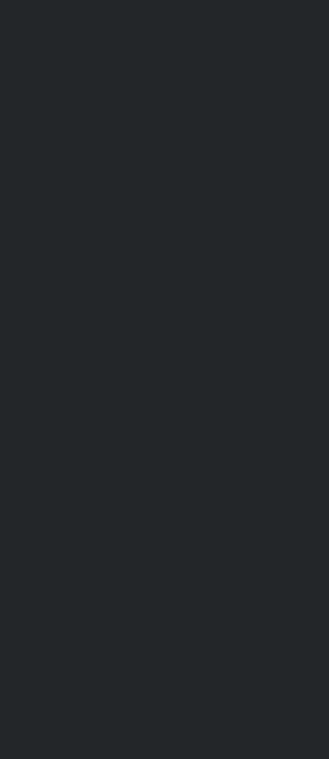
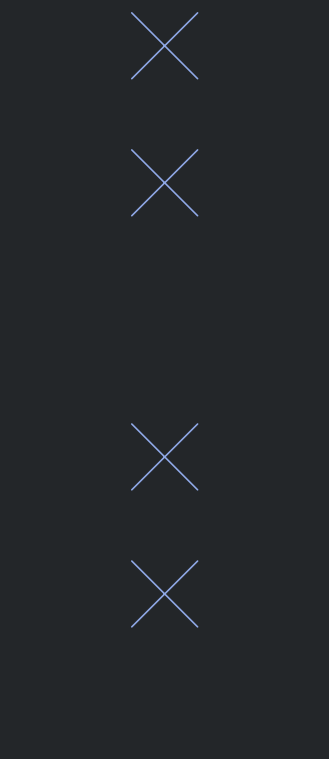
no-connect mark: none -> (164, 45)
no-connect mark: none -> (164, 182)
no-connect mark: none -> (164, 456)
no-connect mark: none -> (164, 593)

